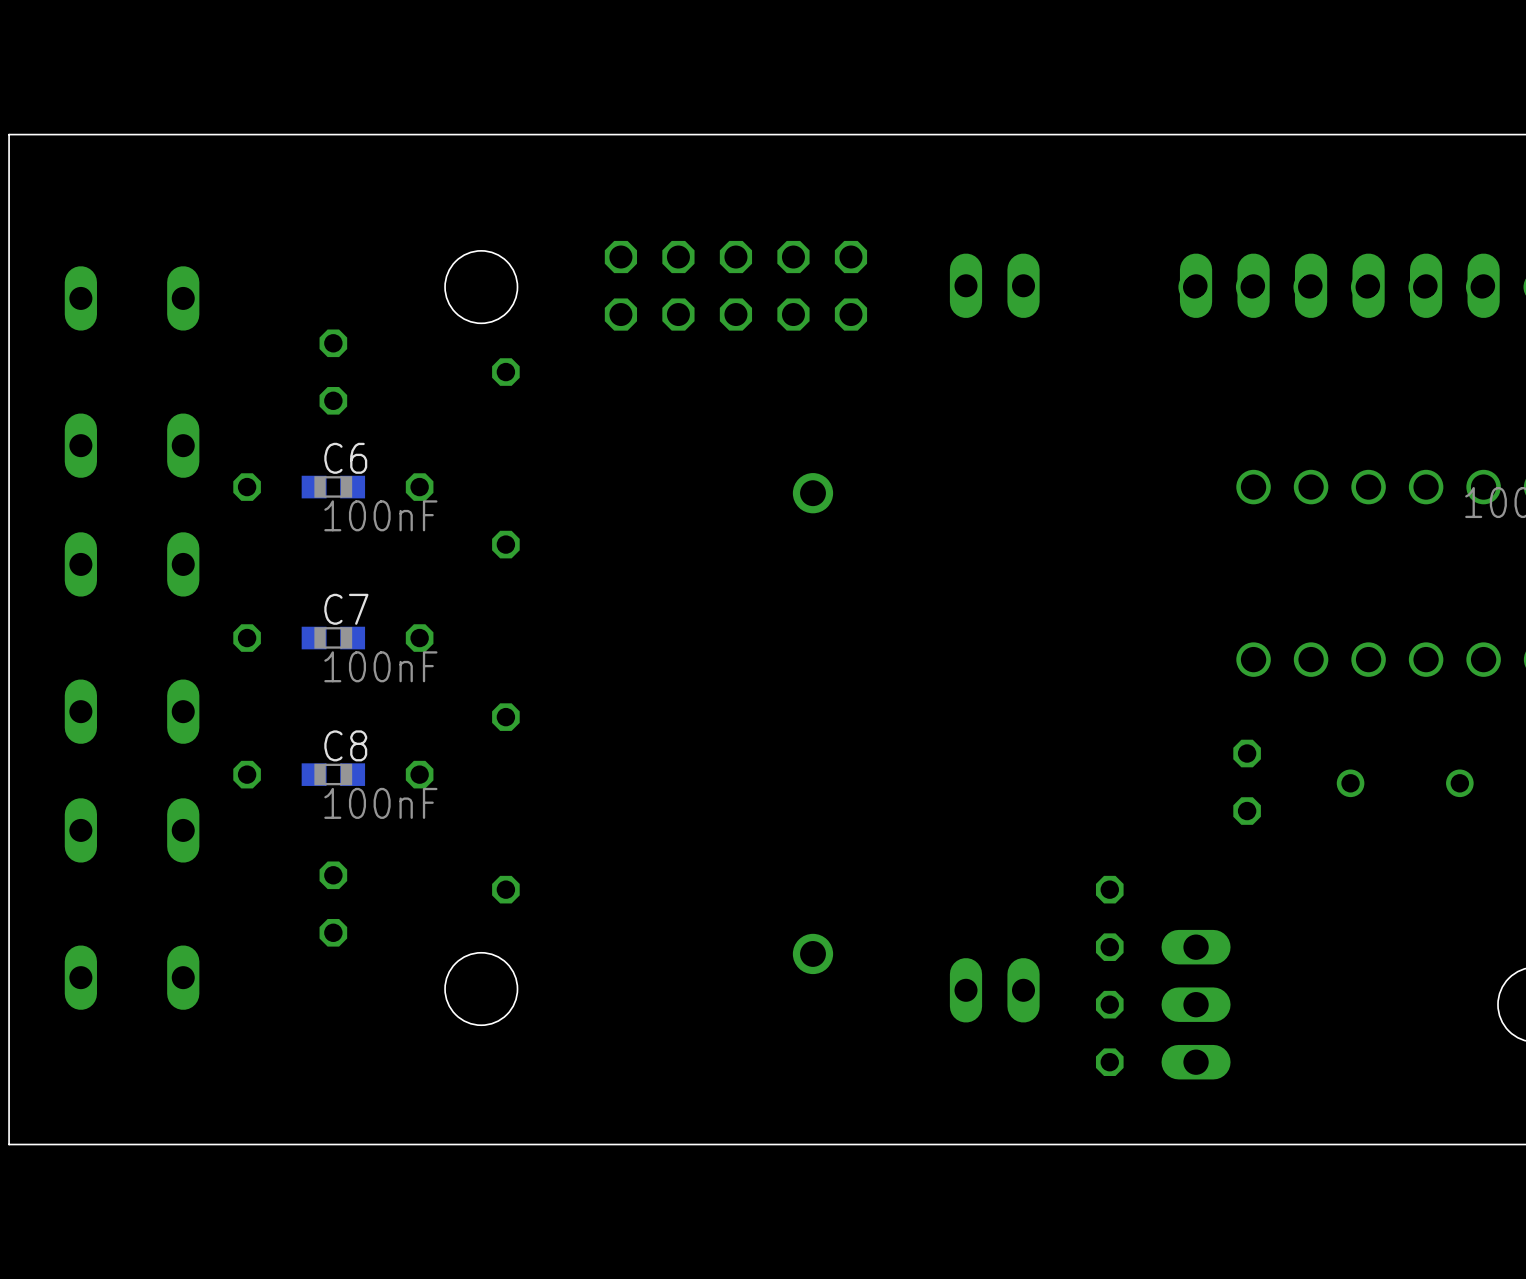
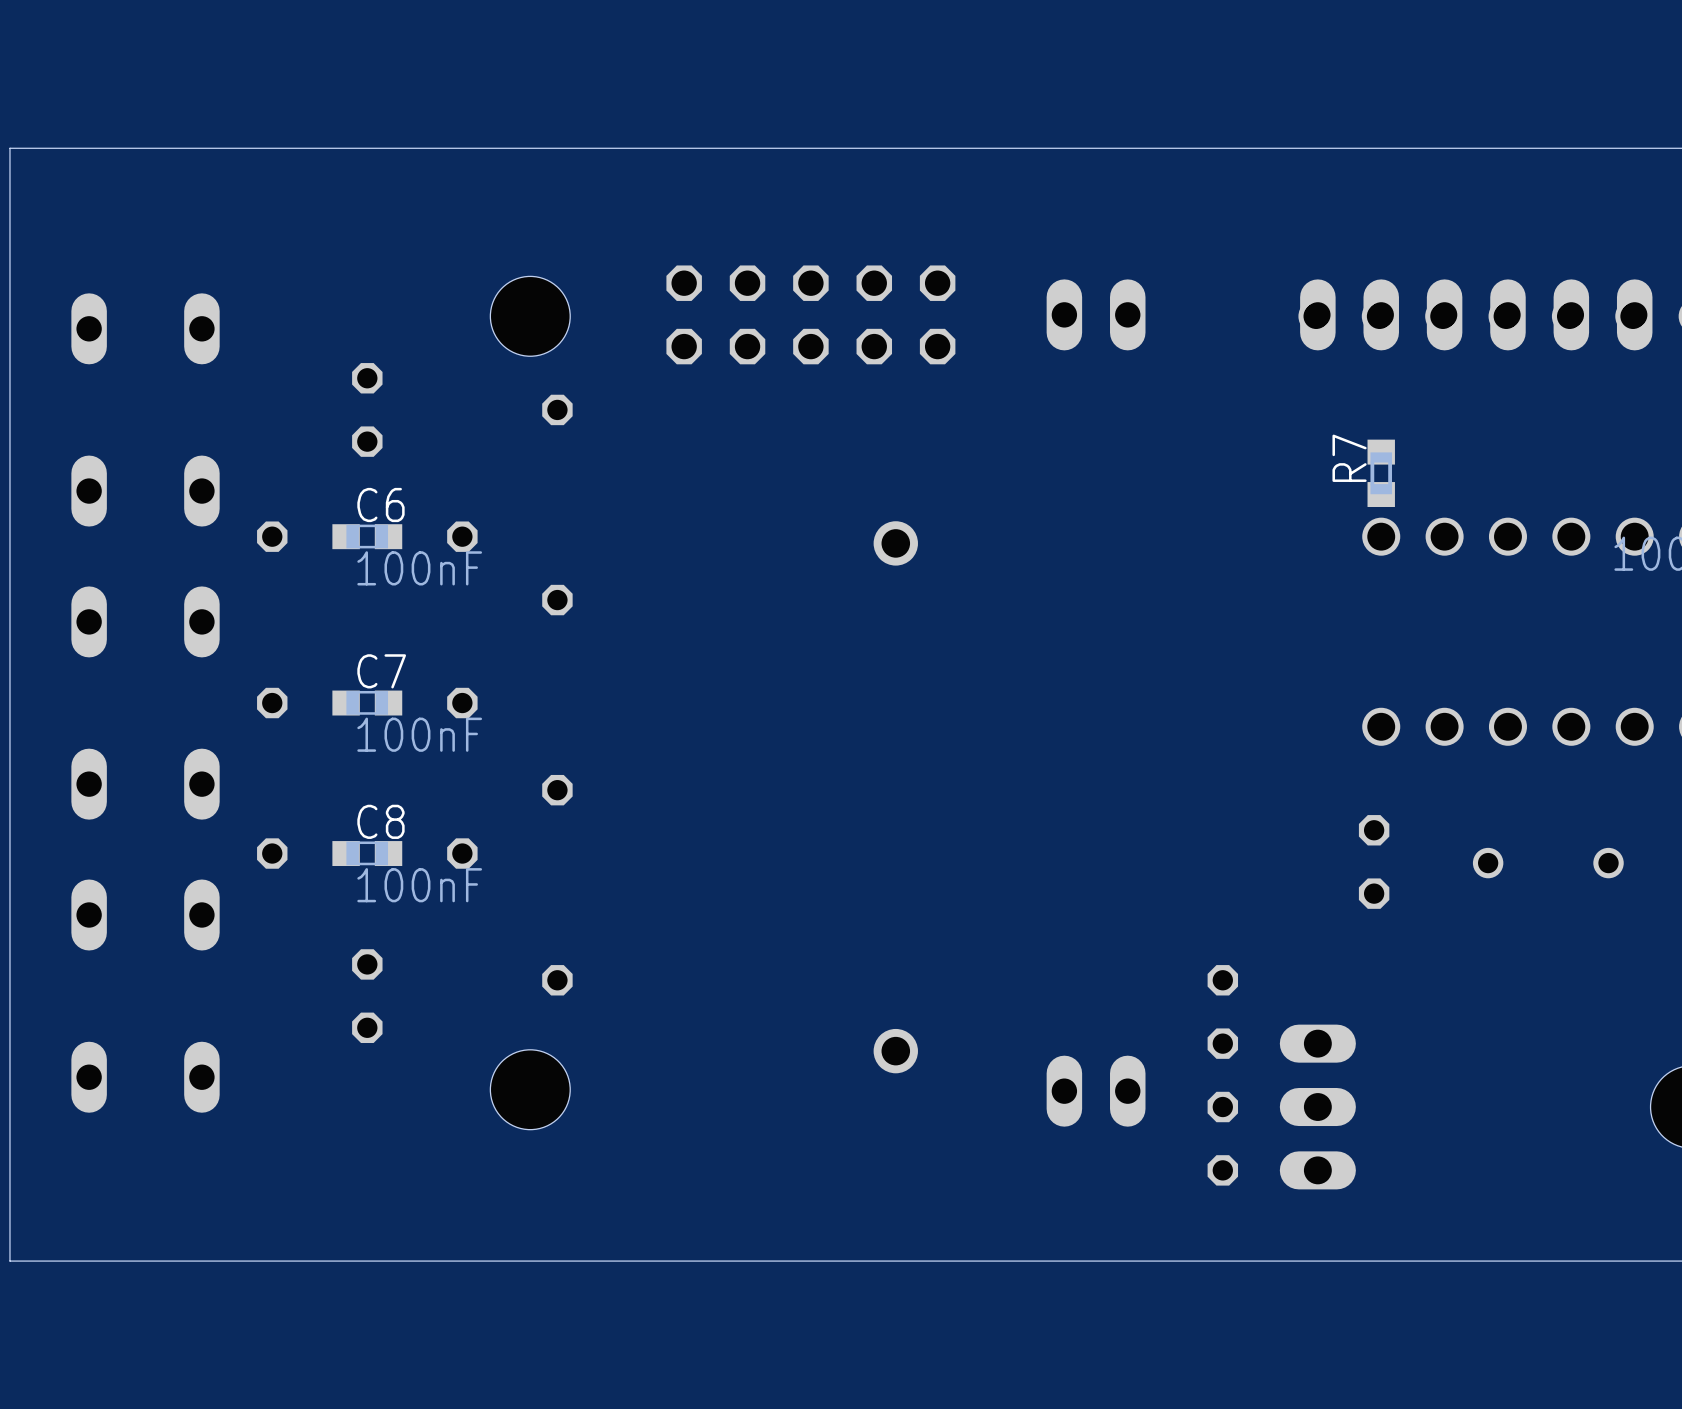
R7: none -> (1381, 473)

